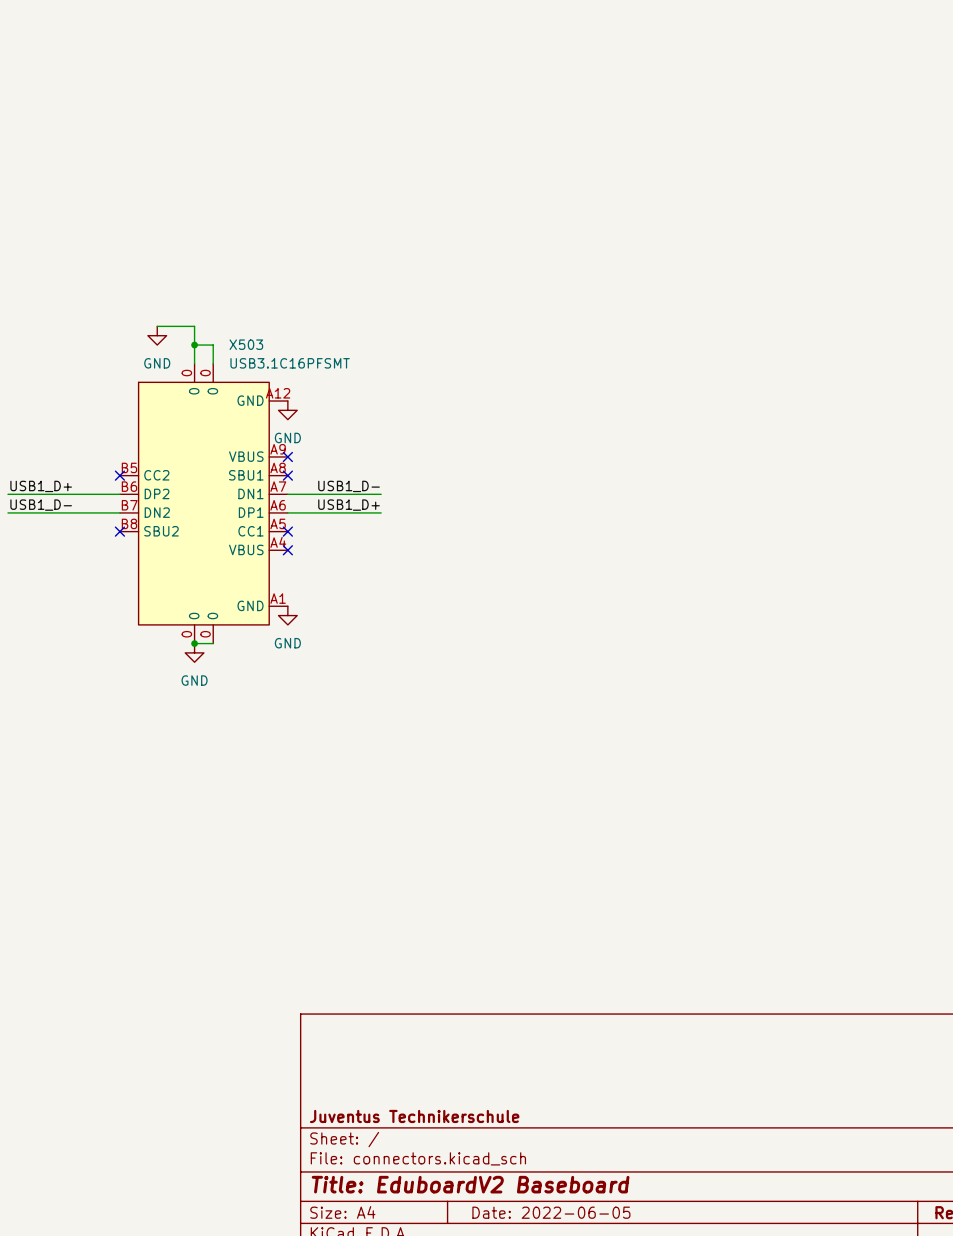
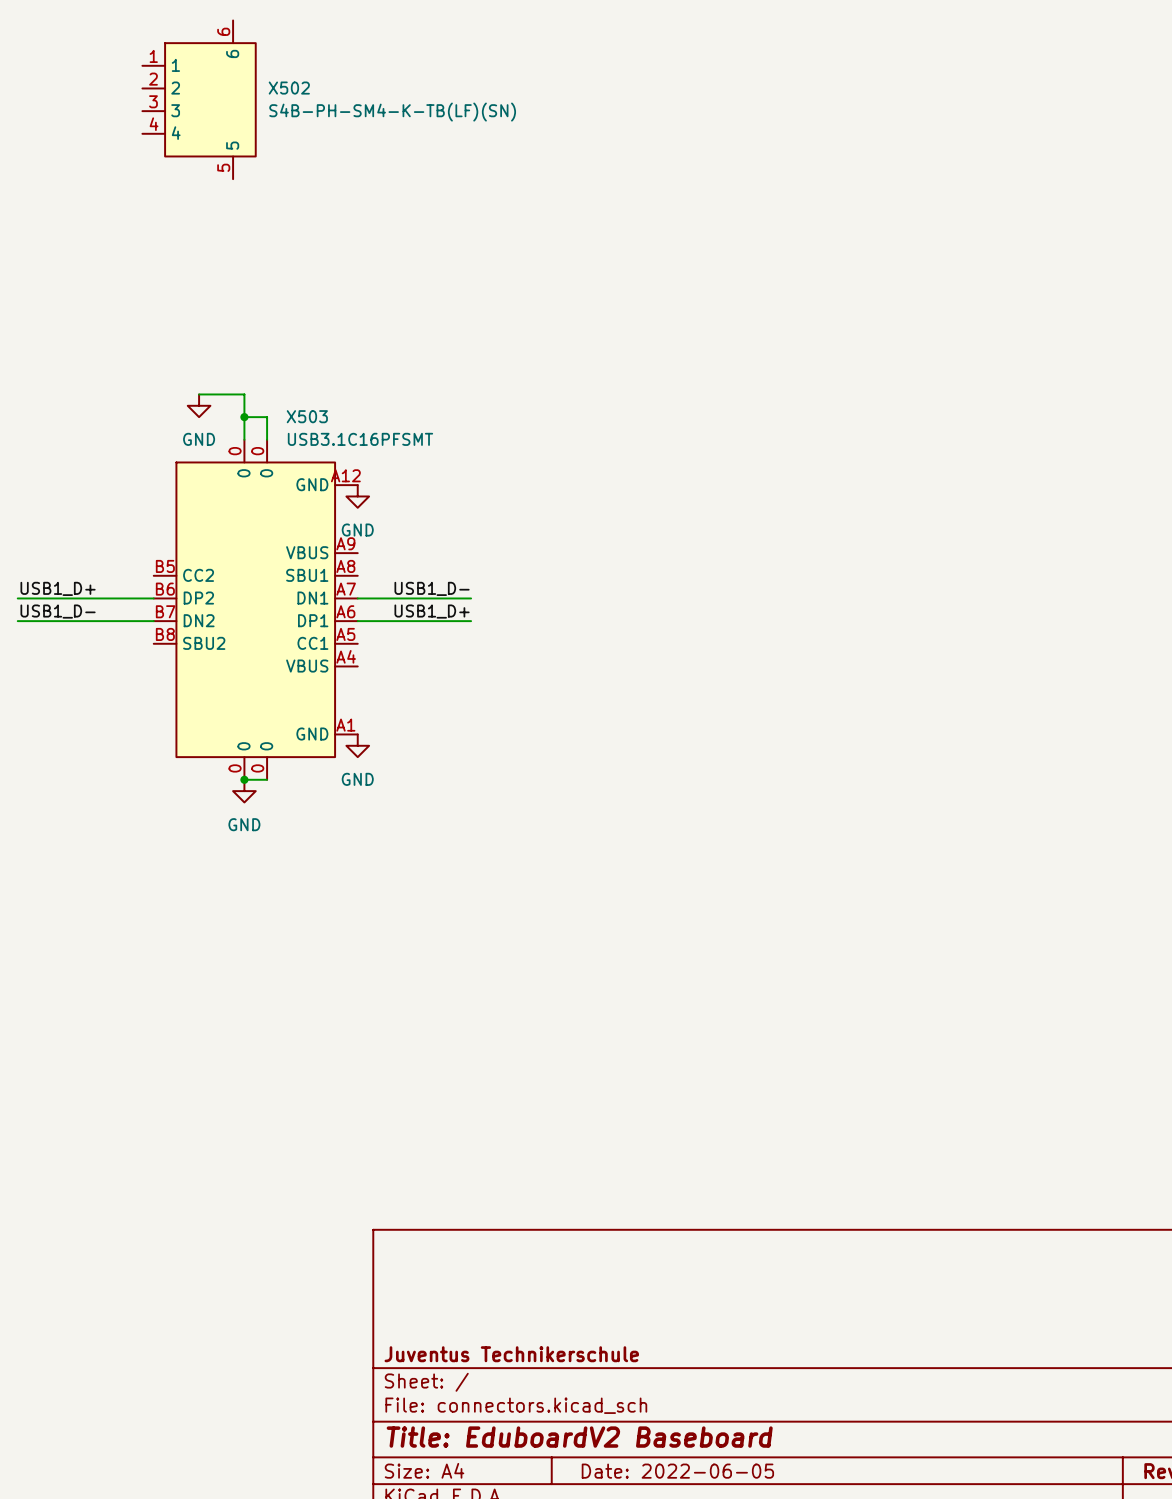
X502: none -> S4B-PH-SM4-K-TB(LF)(SN) (199, 99)
no-connect mark: (287, 456) -> none
no-connect mark: (119, 475) -> none
no-connect mark: (287, 475) -> none
no-connect mark: (119, 531) -> none
no-connect mark: (287, 531) -> none
no-connect mark: (287, 550) -> none

